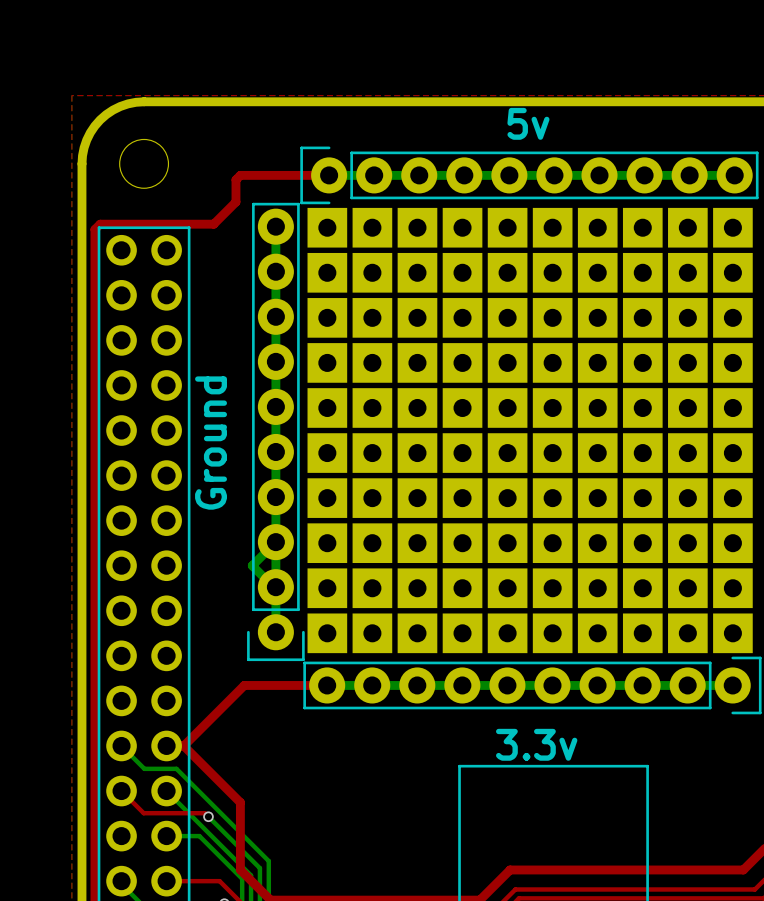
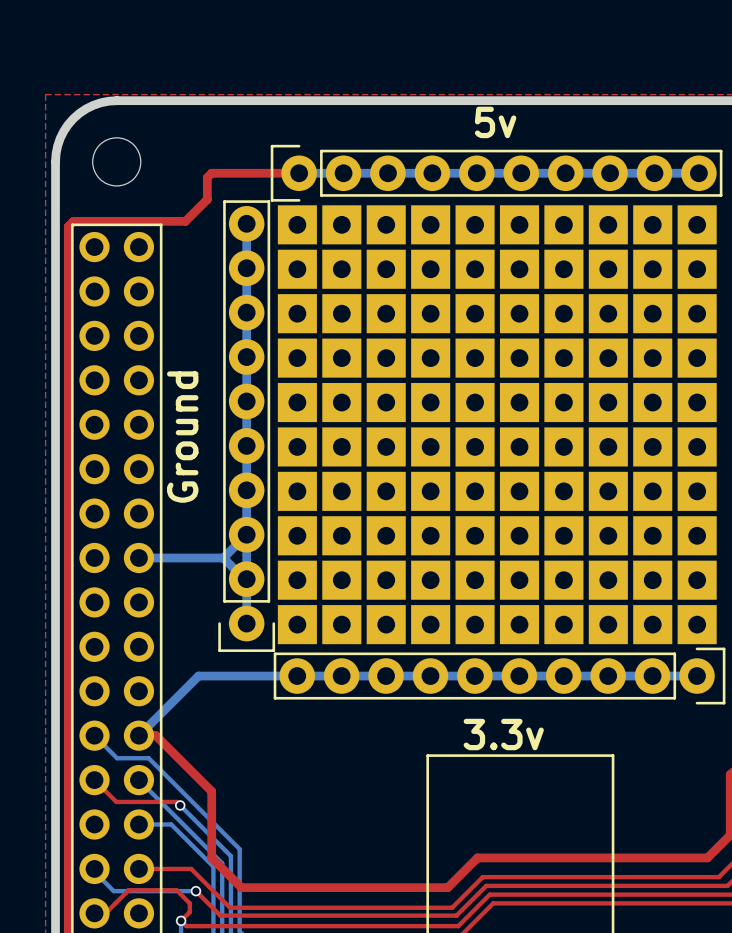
bottom track: none -> (138, 557) (223, 557)
top track: (327, 685) (244, 685) (183, 745) -> none
bottom track: none -> (297, 676) (198, 676) (138, 735)

